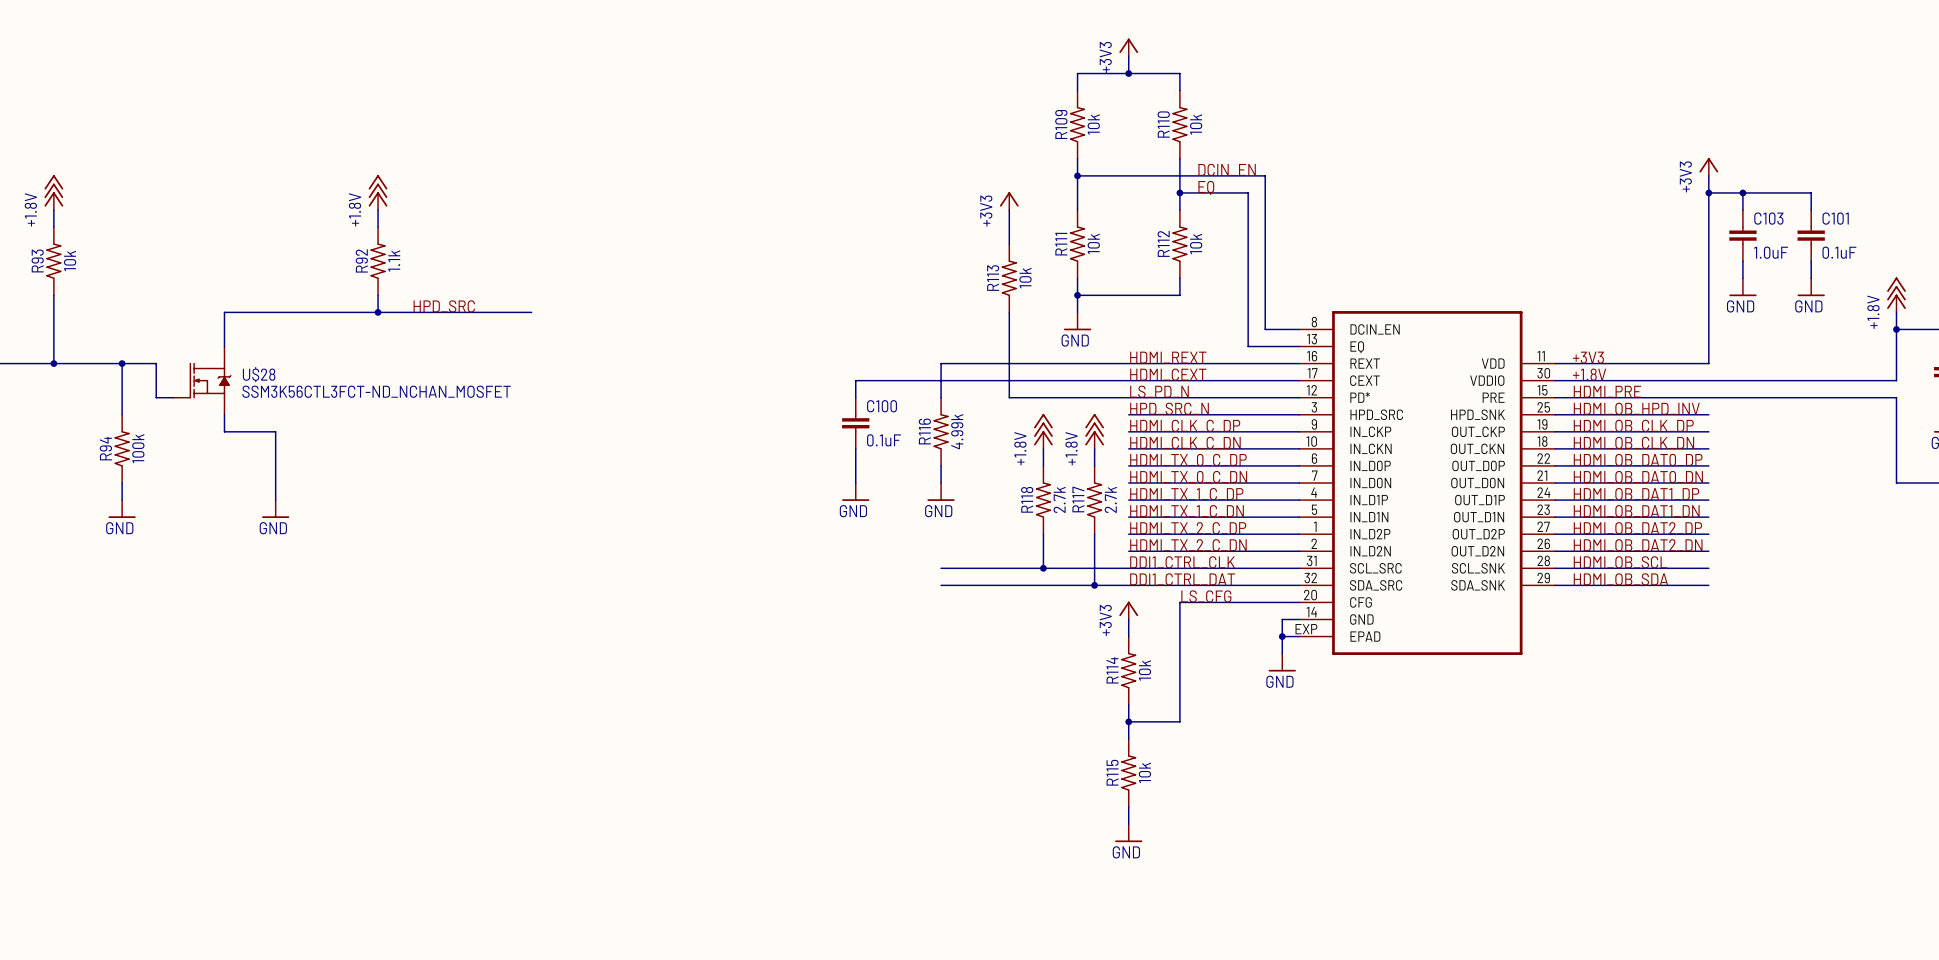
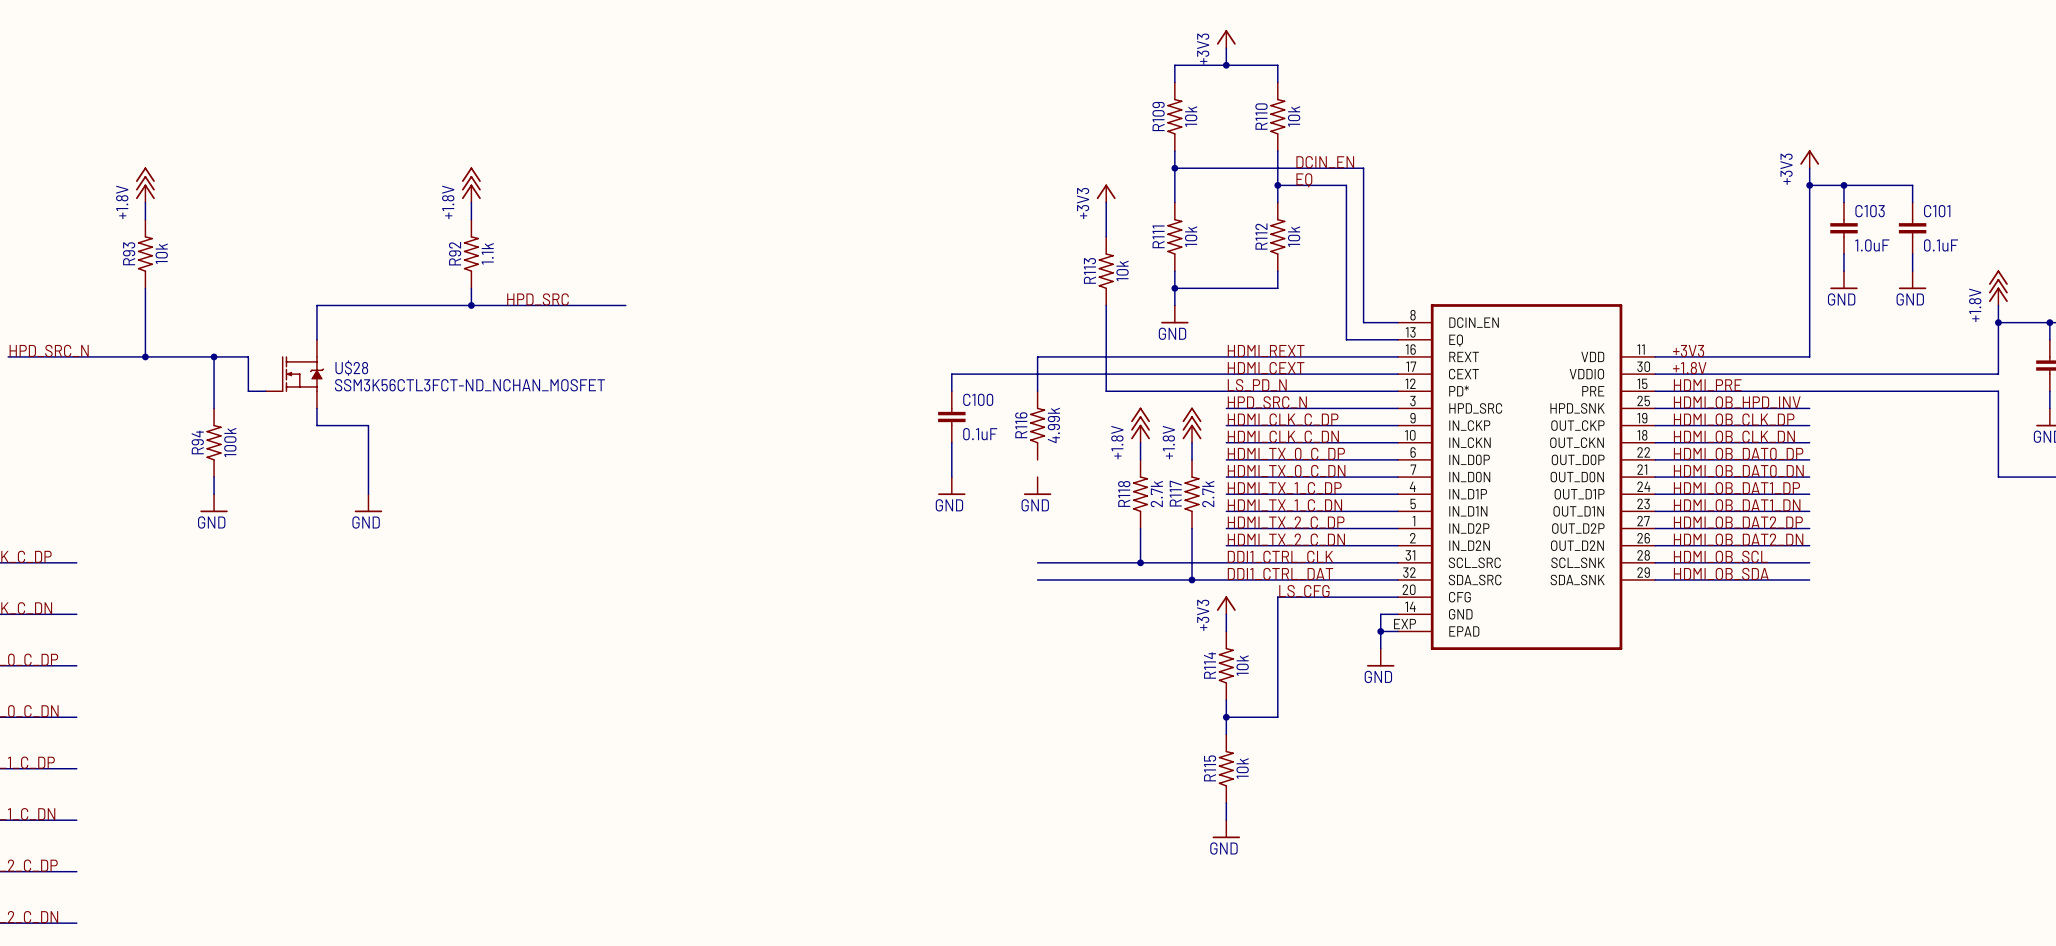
wire: (941, 465) (941, 483) -> none

